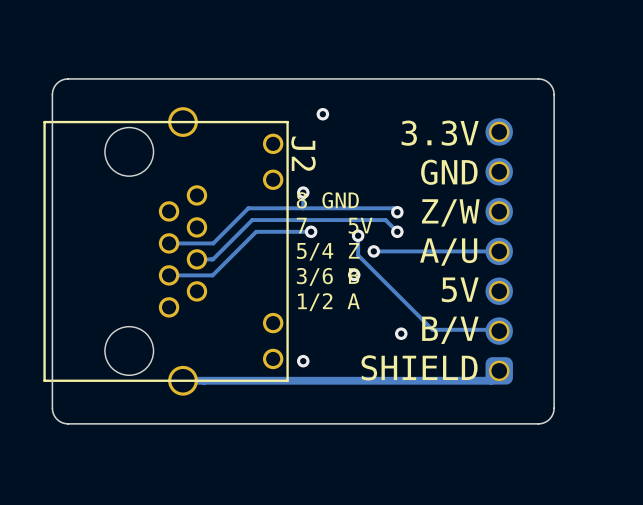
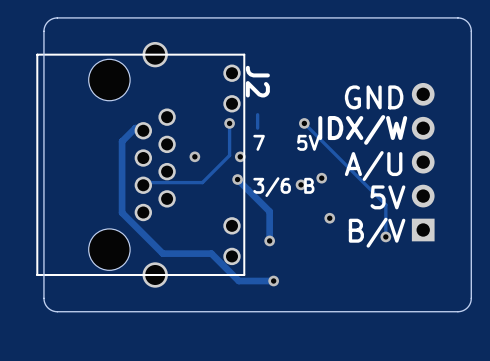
via: (322, 114) -> none
part footprint: [485, 118, 513, 385] -> [411, 82, 435, 242]
text: 3.3V (440, 133) -> none
via: (303, 192) -> none
text: 8 GND (327, 200) -> none
track: none -> (229, 123) (229, 155) (202, 182) (144, 182)
via: none -> (229, 123)
track: none -> (304, 123) (385, 204) (385, 236)
via: none -> (304, 123)
track: none -> (144, 128) (135, 128) (122, 141) (122, 212) (162, 253) (211, 253) (238, 281) (273, 281)
text: none -> IDX/W (362, 129)
track: (397, 212) (393, 208) (248, 208) (213, 243) (169, 243) -> none
via: (397, 212) -> none
text: Z/W (450, 212) -> none
track: (311, 231) (256, 231) (212, 275) (169, 275) -> none
via: (311, 231) -> none
track: (397, 231) (385, 220) (252, 220) (212, 259) (196, 259) -> none
via: (397, 231) -> none
track: (358, 235) (358, 255) (432, 329) (499, 331) -> none
via: (358, 235) -> none
via: none -> (194, 156)
via: none -> (240, 156)
text: 5/4 Z (328, 251) -> none
via position: (373, 251) -> (321, 178)
track: (499, 251) (373, 251) -> none
track: none -> (237, 179) (269, 211) (269, 240)
via: none -> (237, 179)
text: 1/2 A (328, 302) -> none
via position: (401, 333) -> (329, 218)
via: none -> (385, 236)
via: none -> (269, 240)
via: (303, 361) -> none
text: SHIELD (419, 367) -> none
track: (499, 370) (491, 380) (183, 380) -> none
via: none -> (273, 281)

